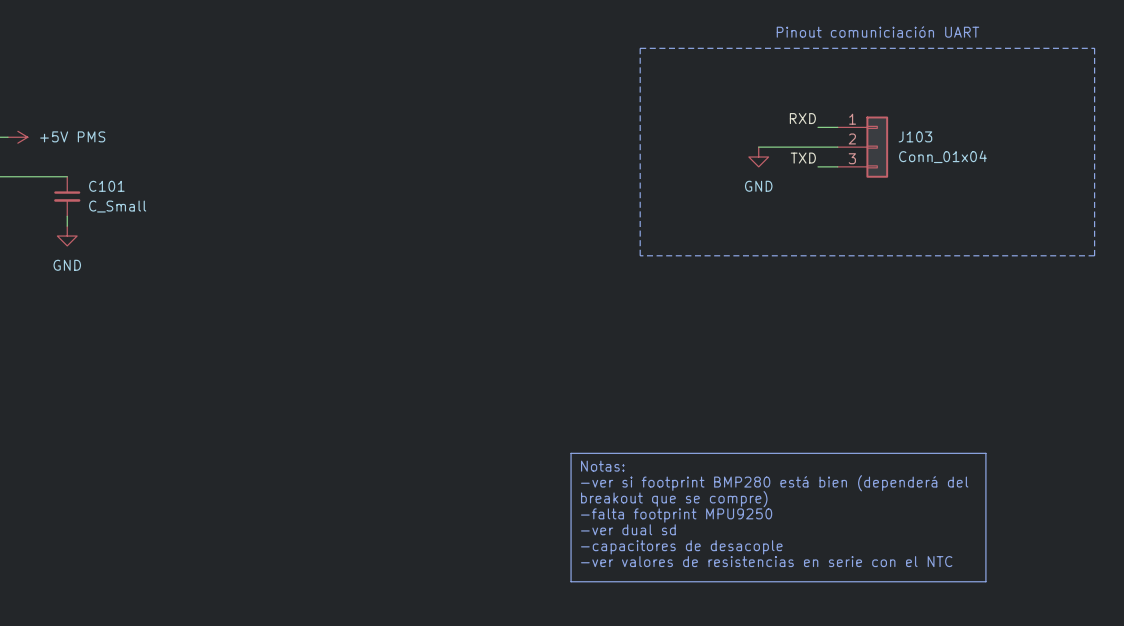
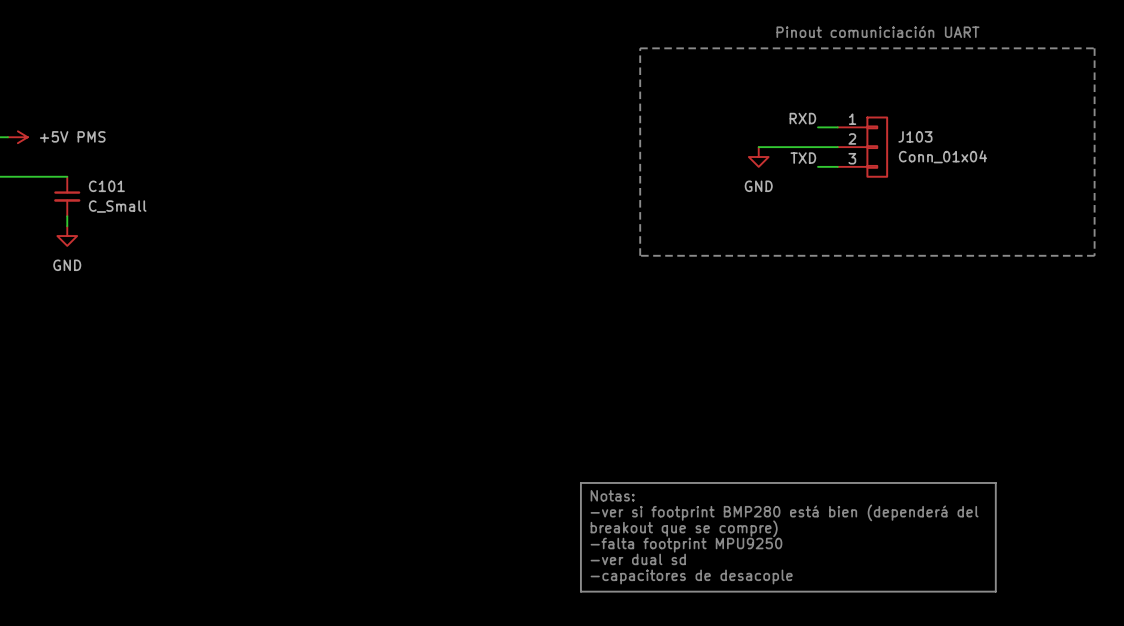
line: (571, 453) (985, 453) (985, 581) (571, 581) (571, 453) -> (580, 482) (580, 591) (995, 591) (995, 482) (580, 482)
text position: Notas: (602, 466) -> Notas: (612, 495)
text position: -ver si footprint BMP280 está bien (dependerá del (774, 483) -> -ver si footprint BMP280 está bien (dependerá del (784, 512)
text position: breakout que se compre) (674, 499) -> breakout que se compre) (684, 528)
text position: -falta footprint MPU9250 (676, 515) -> -falta footprint MPU9250 (686, 545)
text position: -ver dual sd (628, 529) -> -ver dual sd (638, 559)
text position: -capacitores de desacople (681, 547) -> -capacitores de desacople (691, 576)
text: -ver valores de resistencias en serie con el NTC (766, 561) -> none

